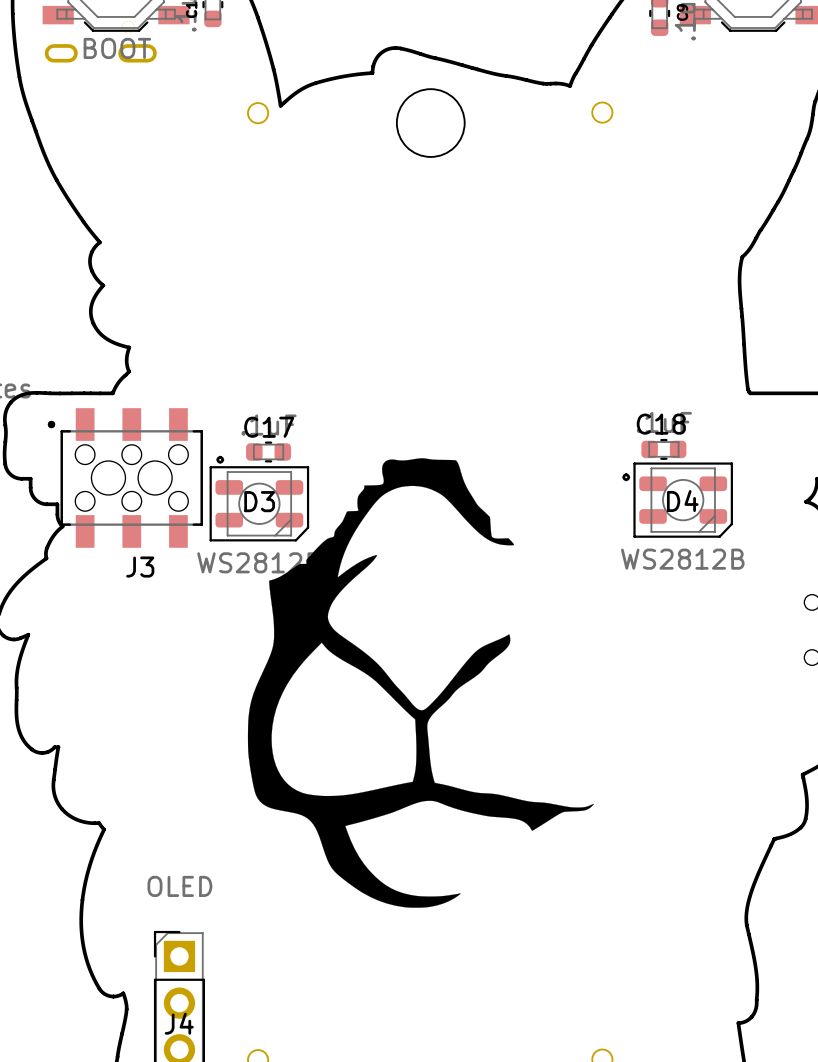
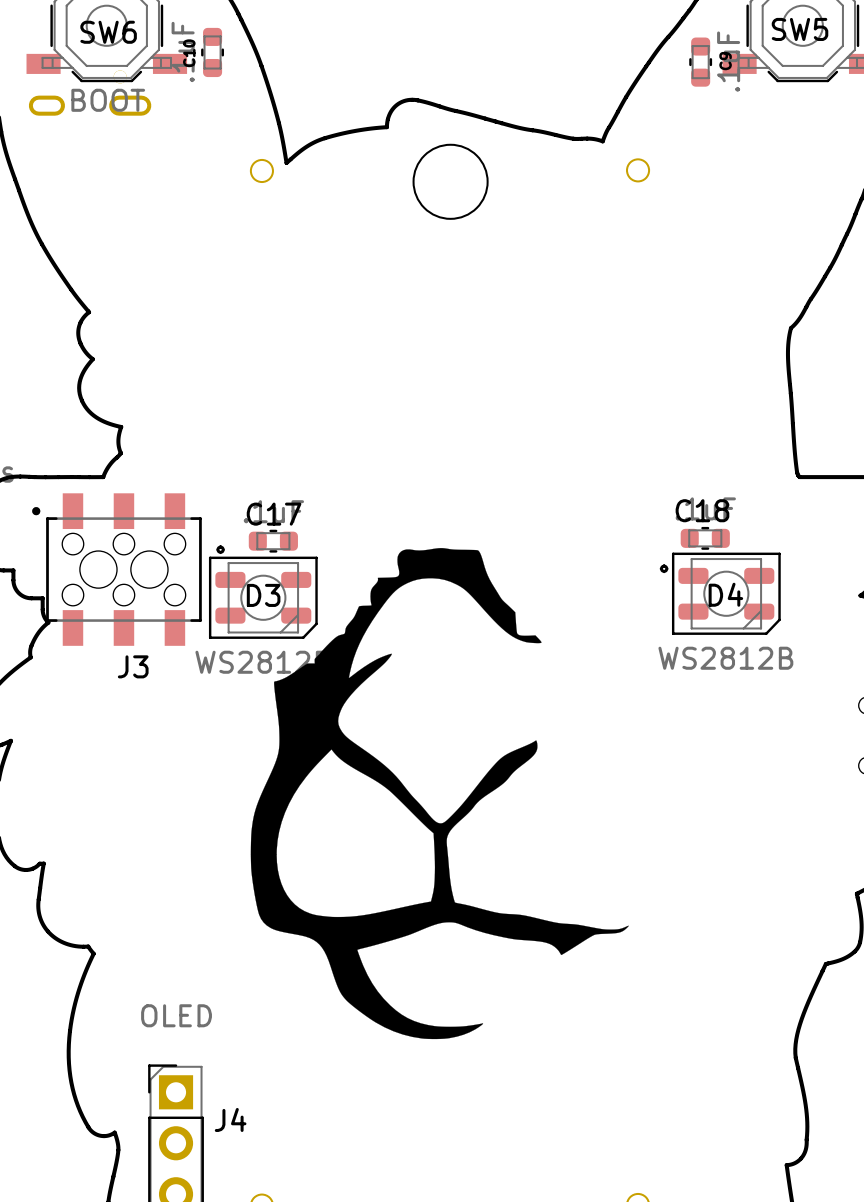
J4 name position: J4 (179, 1023) -> J4 (230, 1119)

